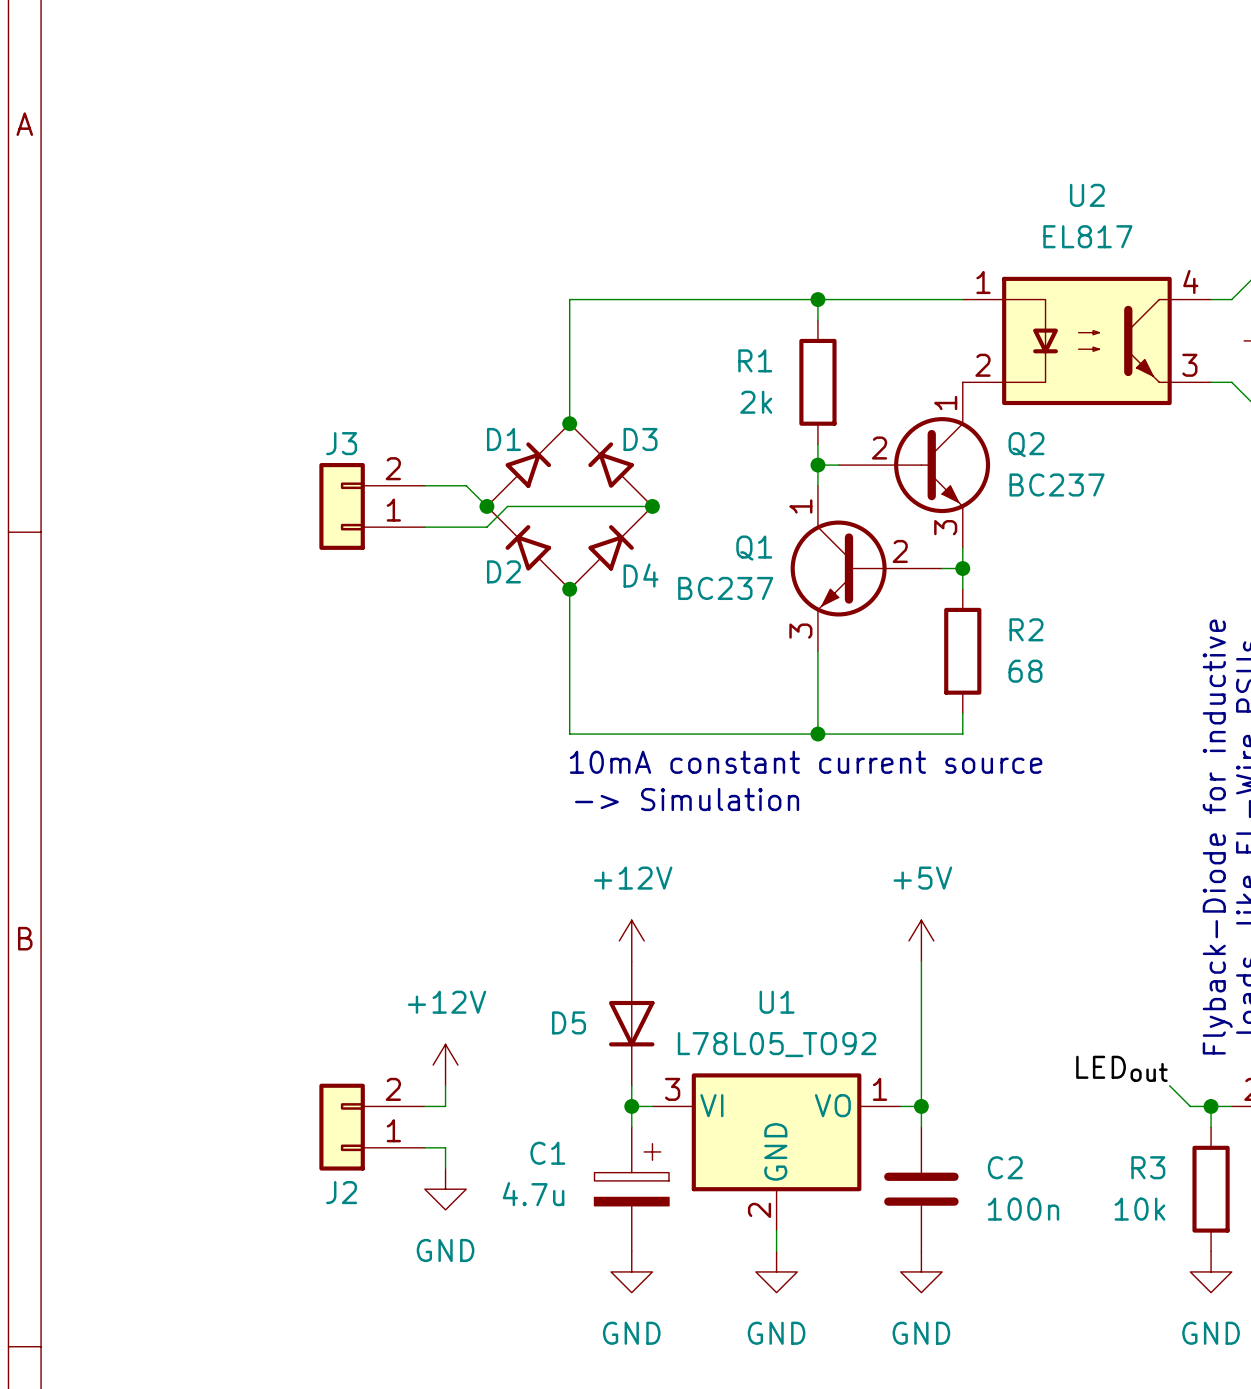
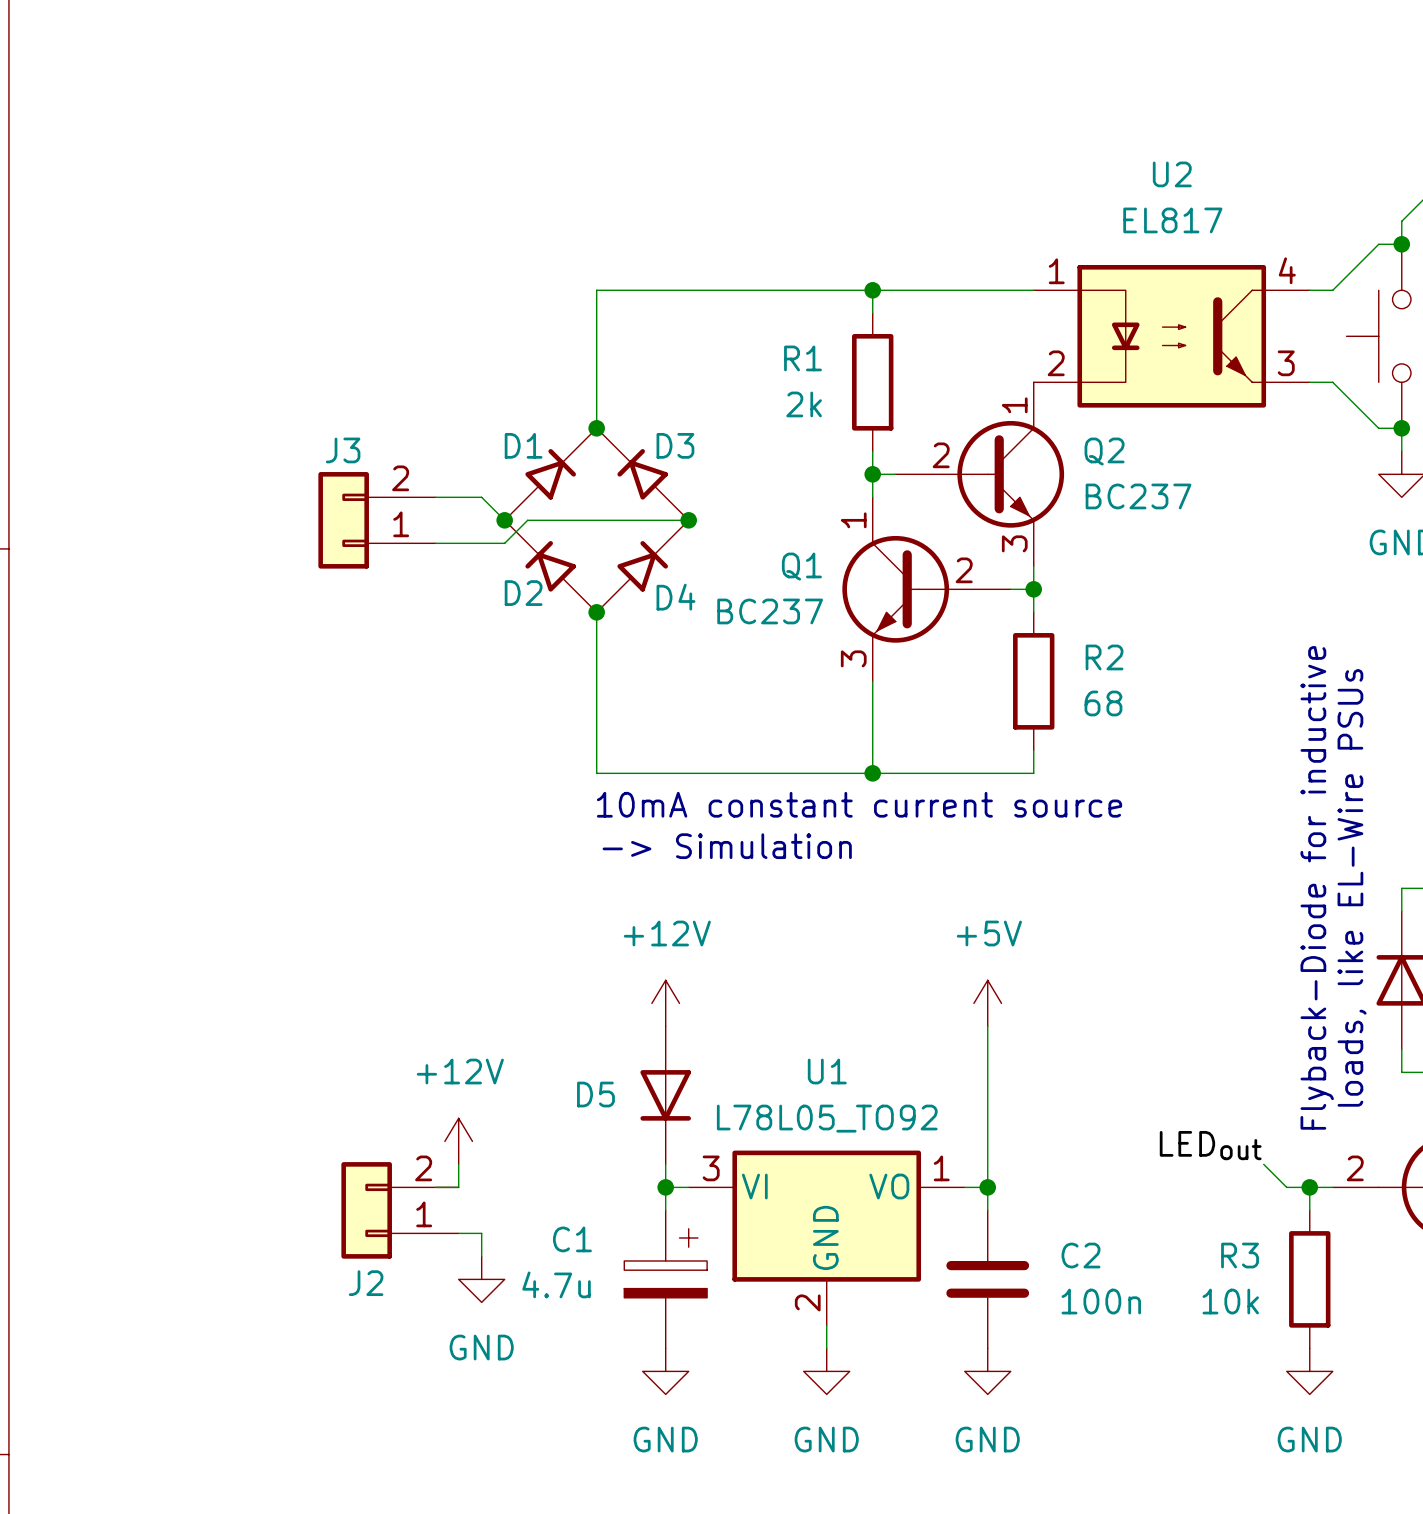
J2 position: (372, 1127) -> (400, 1210)
wire: (424, 1147) (445, 1147) (445, 1168) -> (458, 1233) (481, 1233) (481, 1256)
power symbol position: GND (445, 1189) -> GND (481, 1279)

